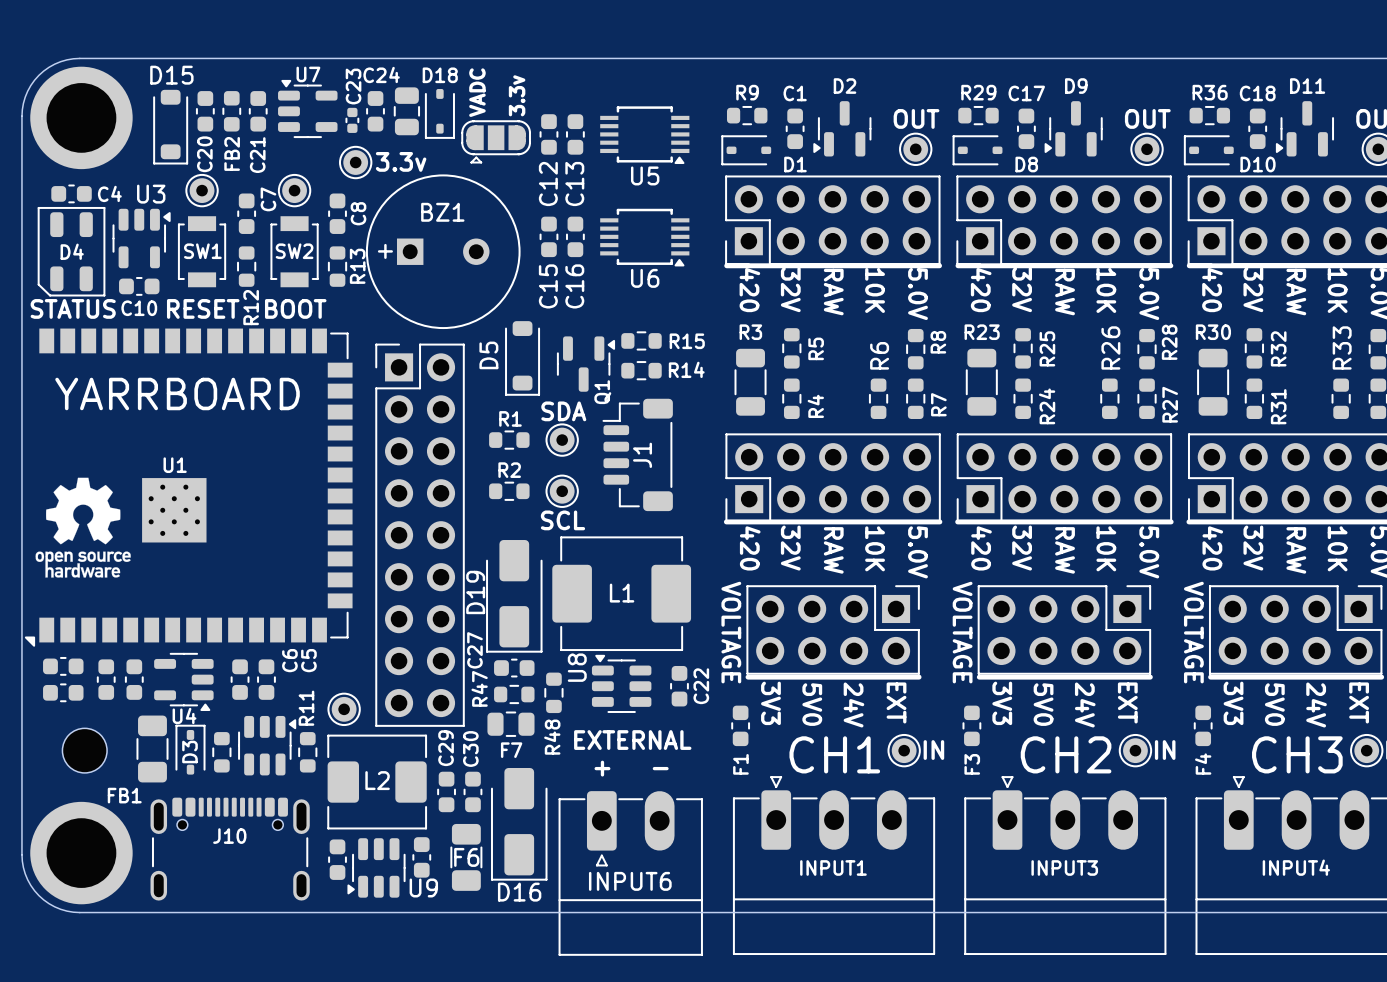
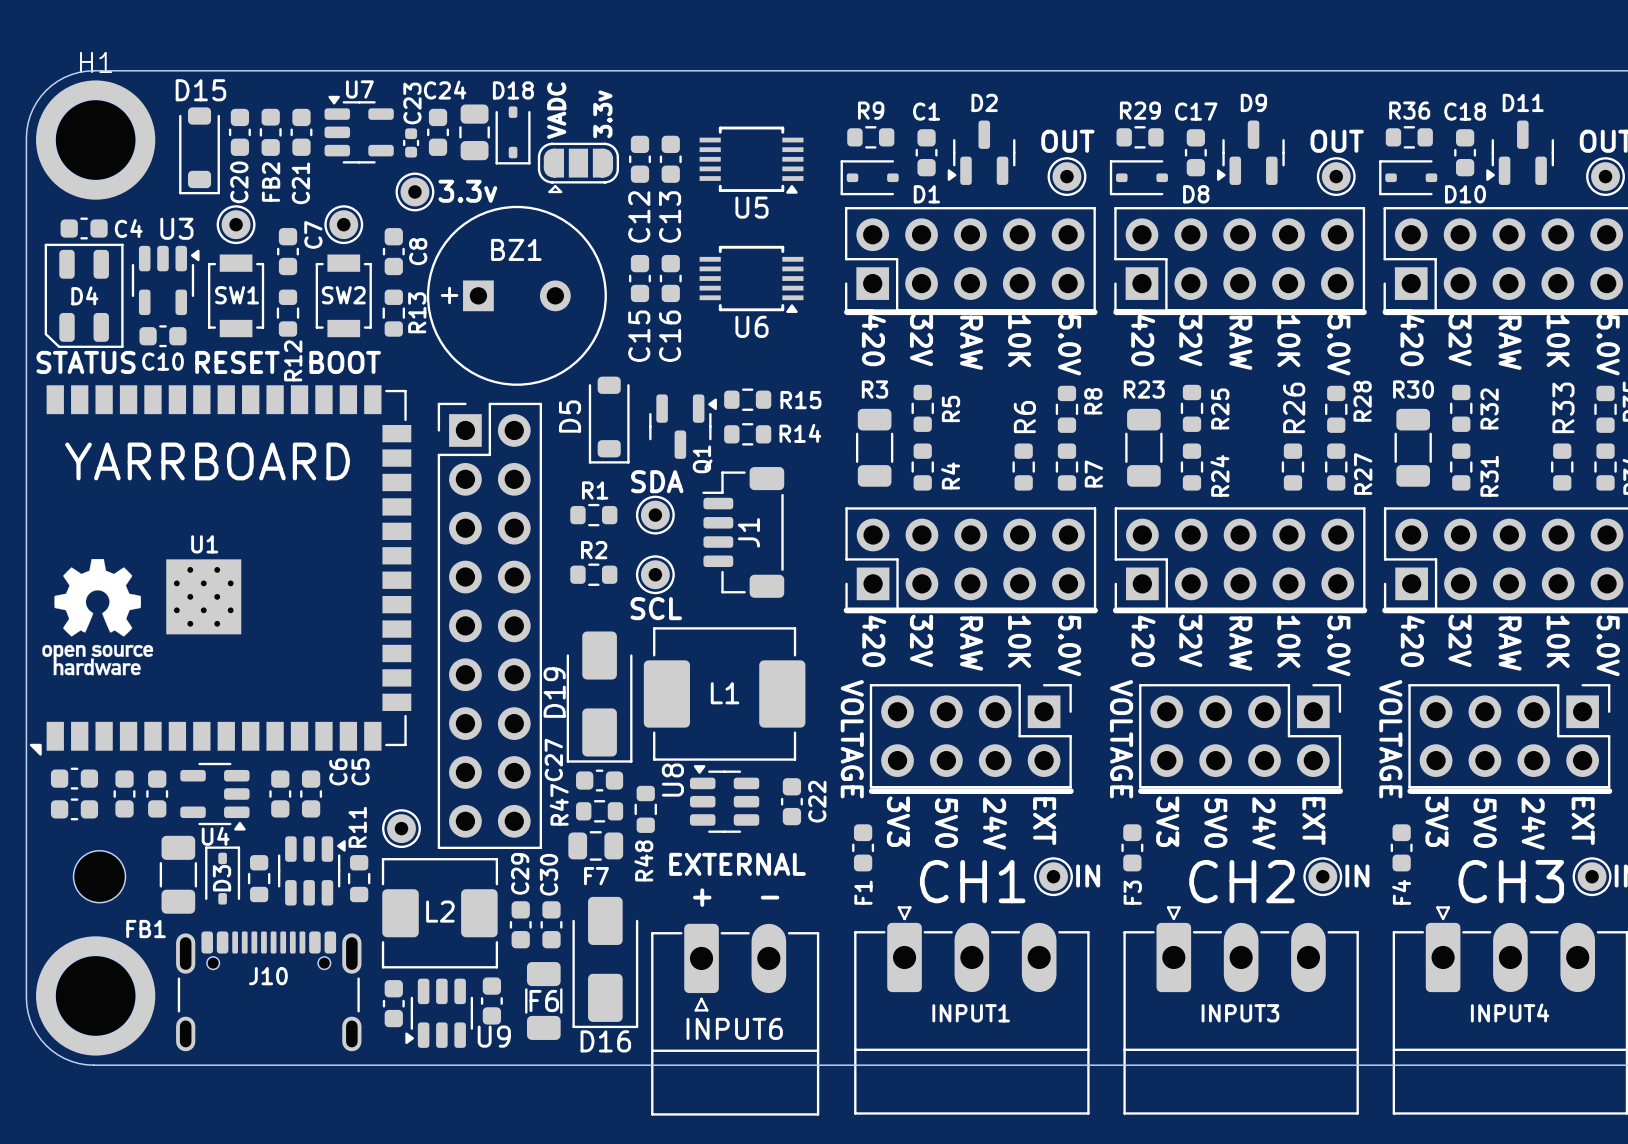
part: (81, 117) -> none
H1: none -> (95, 140)
part footprint: [30, 801, 133, 905] -> [36, 936, 156, 1056]

